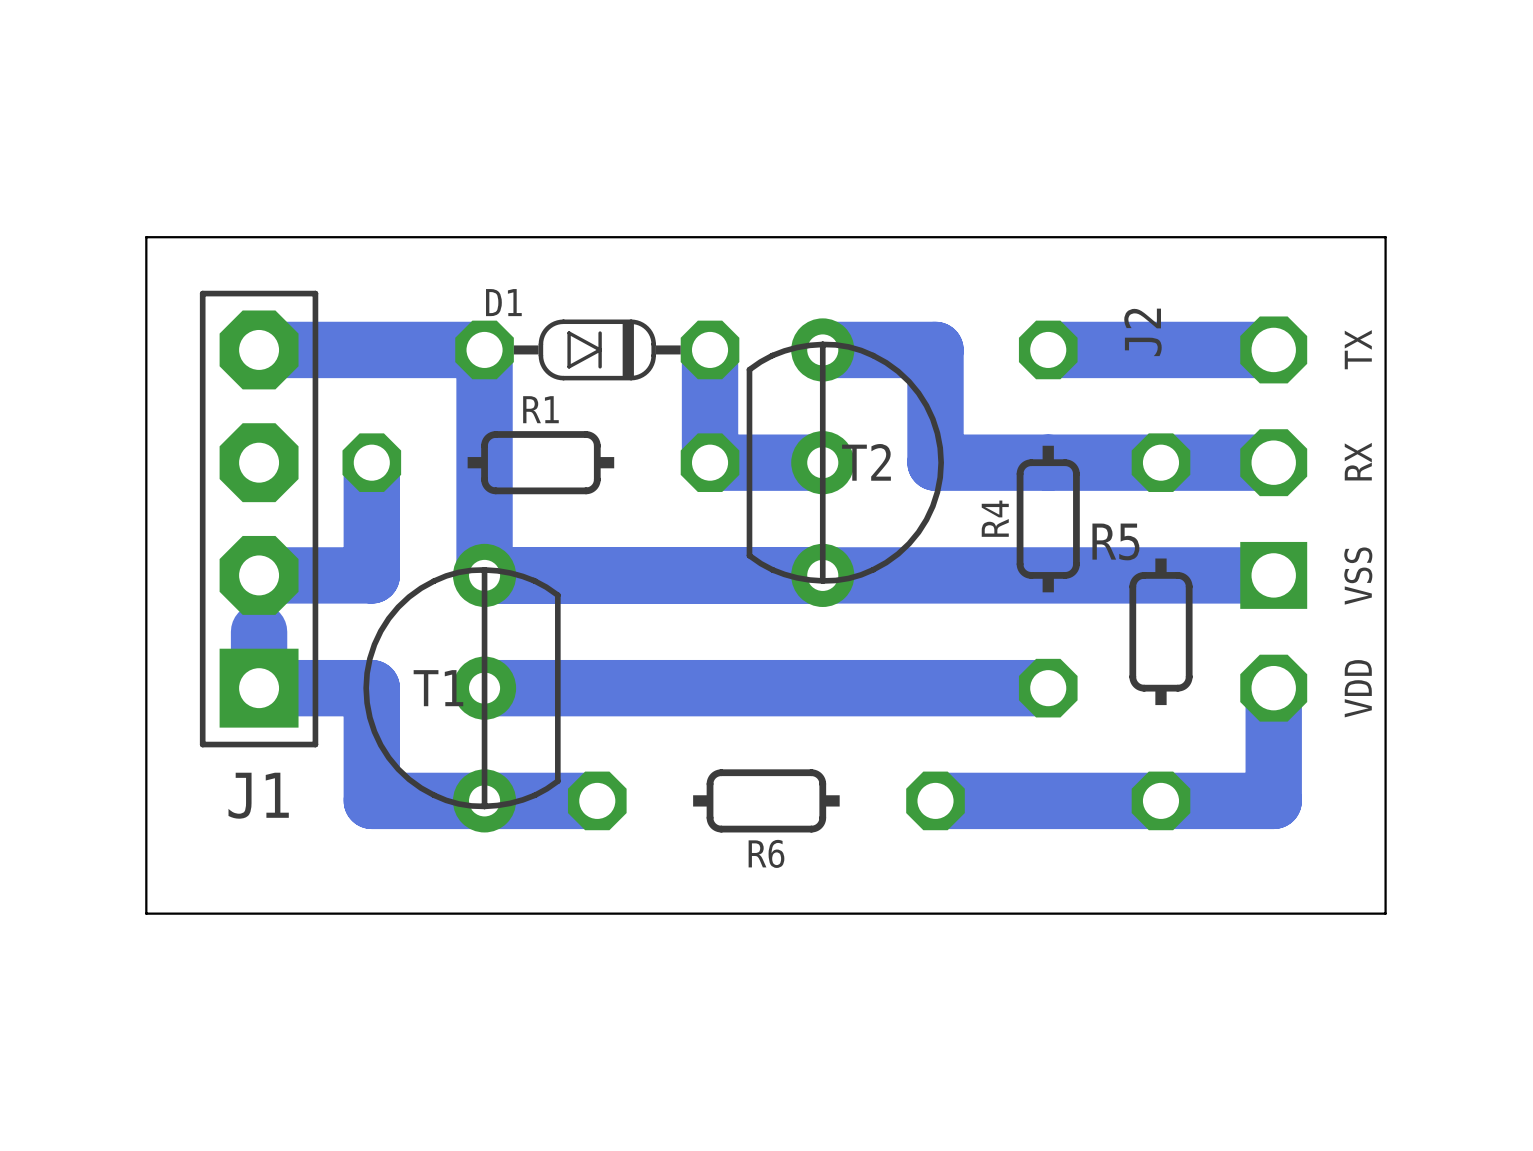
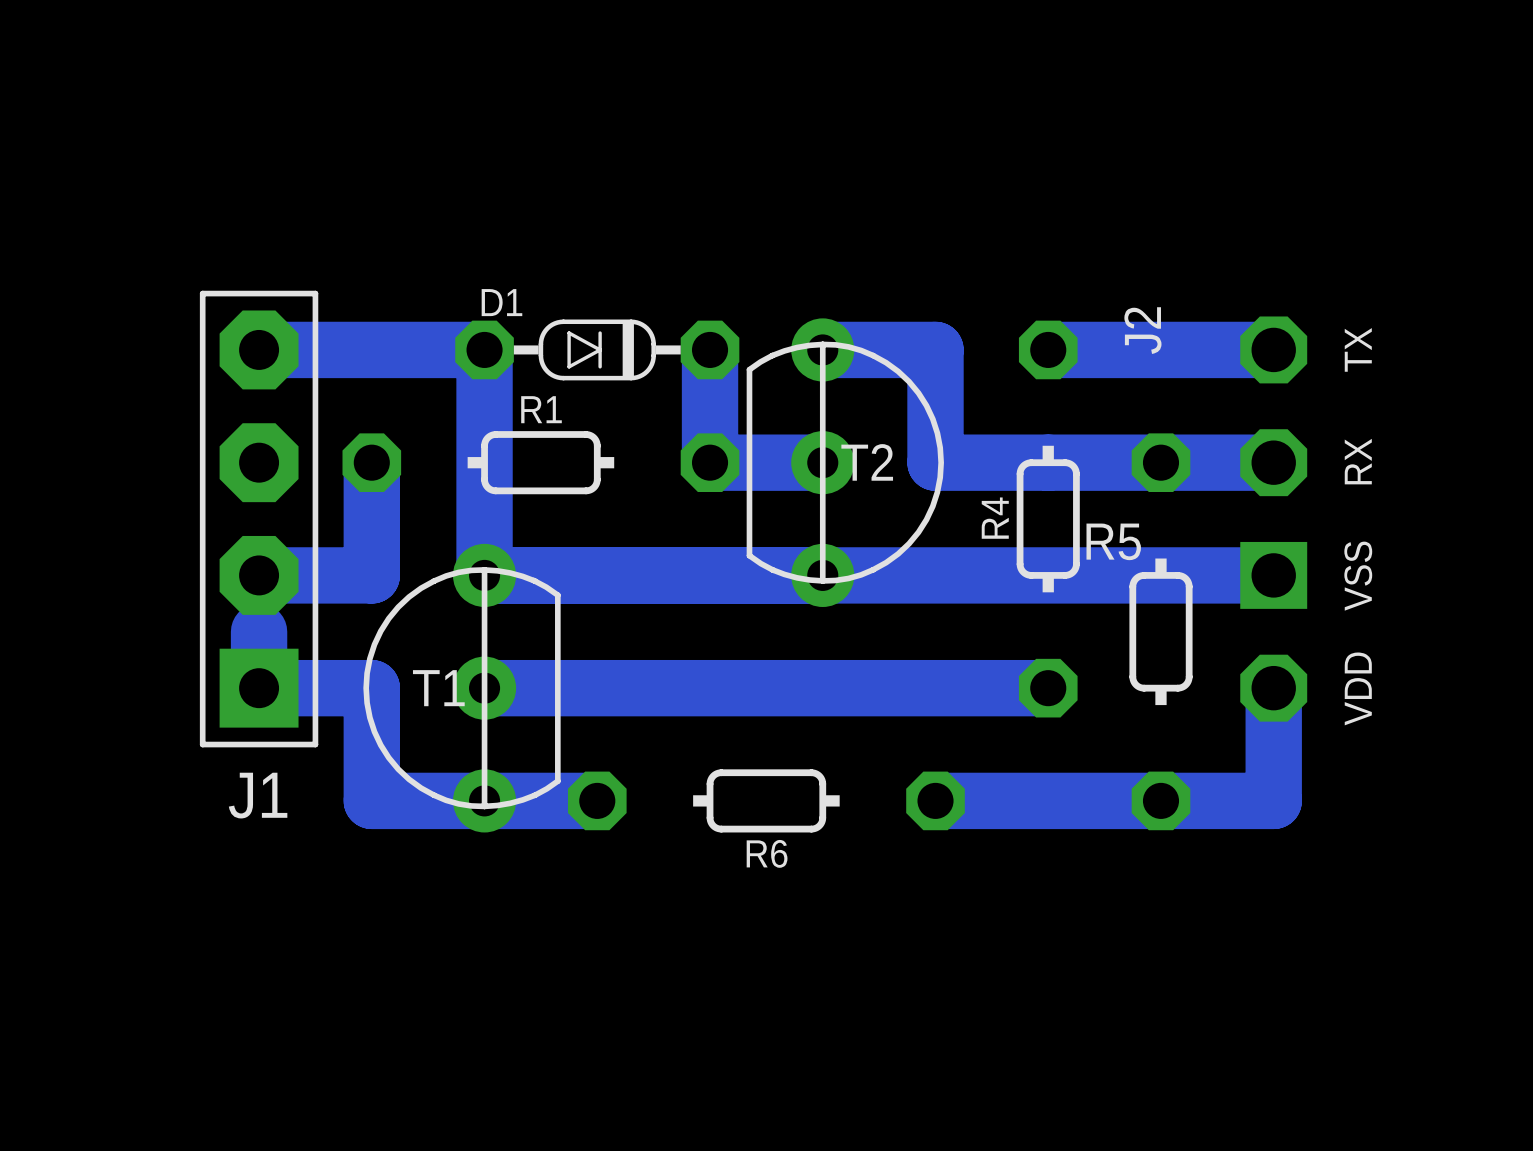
board edge: (146, 237) (1385, 237) (1385, 913) (146, 913) (146, 237) -> none

